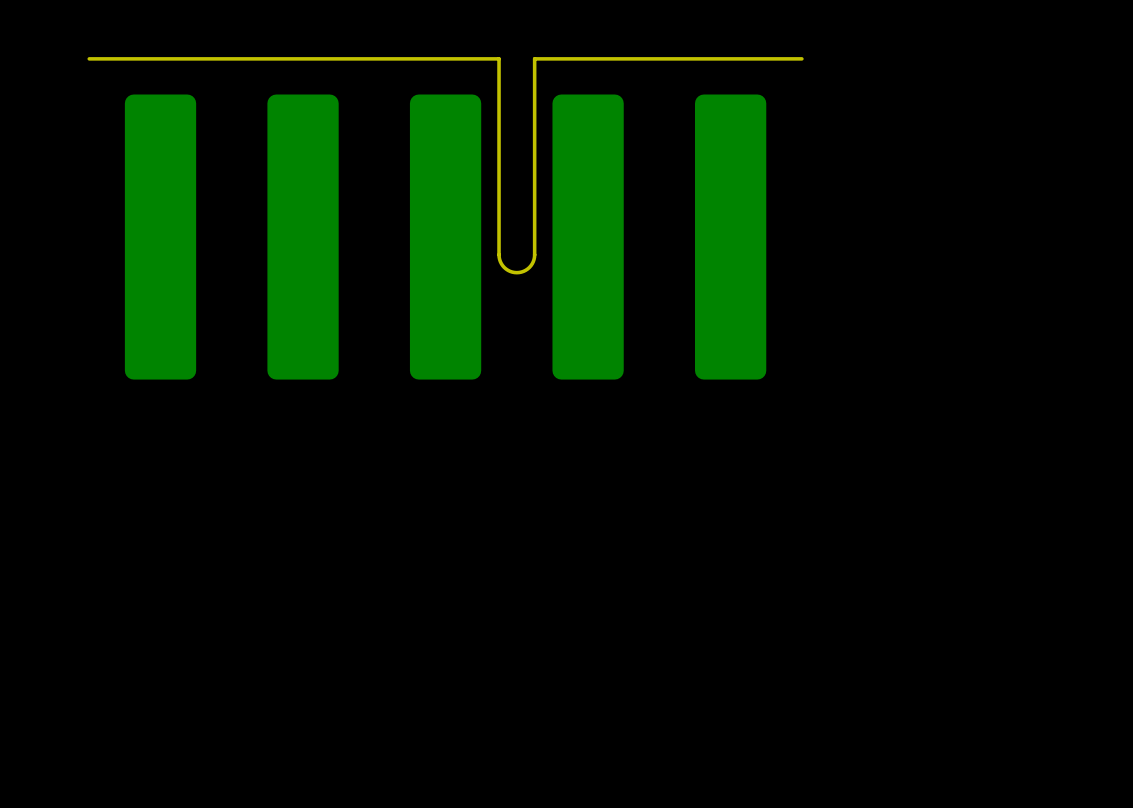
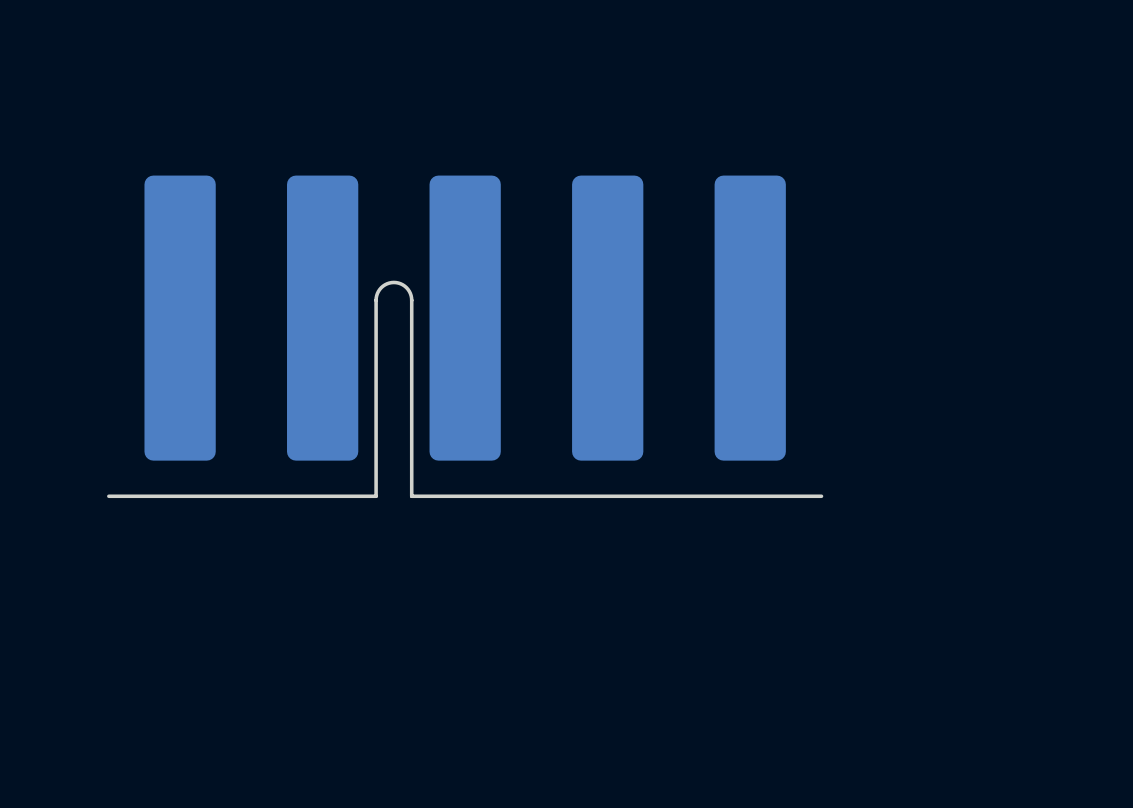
part rotation: 0° (445, 218) -> 180° (465, 336)

